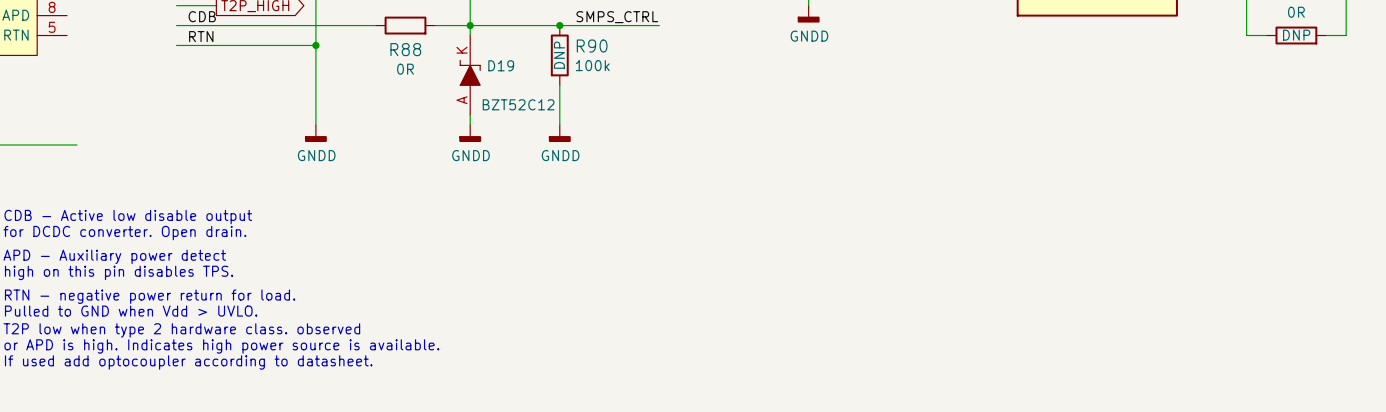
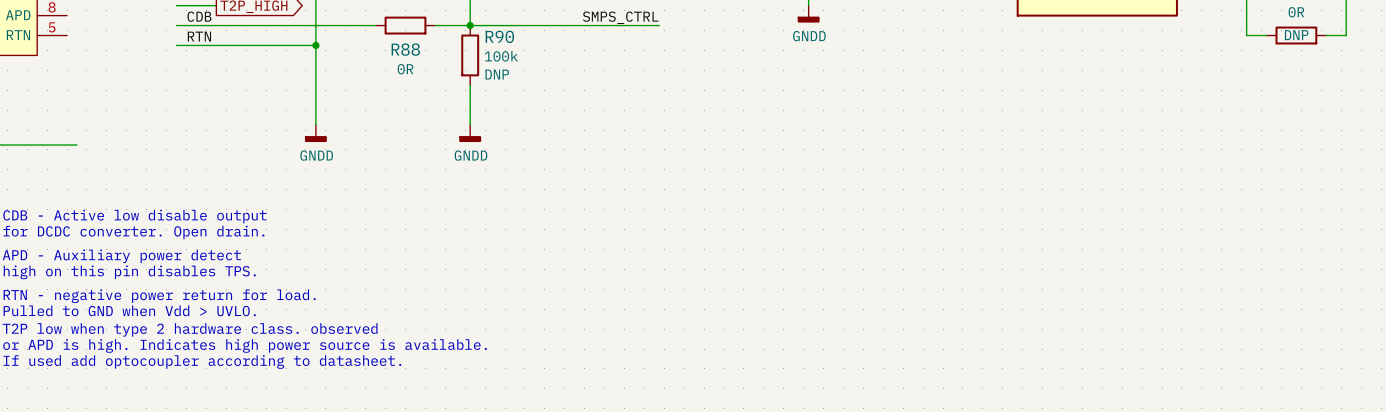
junction: (559, 25) -> none
R90 name position: R90 (592, 46) -> R90 (499, 36)
R90 position: (559, 55) -> (470, 55)
R90 text rotation: 0° (559, 55) -> 90° clockwise (497, 74)
R90 text position: DNP (559, 55) -> DNP (497, 74)
R90 text position: 100k (592, 65) -> 100k (501, 56)
D19: BZT52C12 (470, 75) -> none
wire: (559, 85) (559, 125) -> none
power symbol: GNDD (559, 133) -> none

